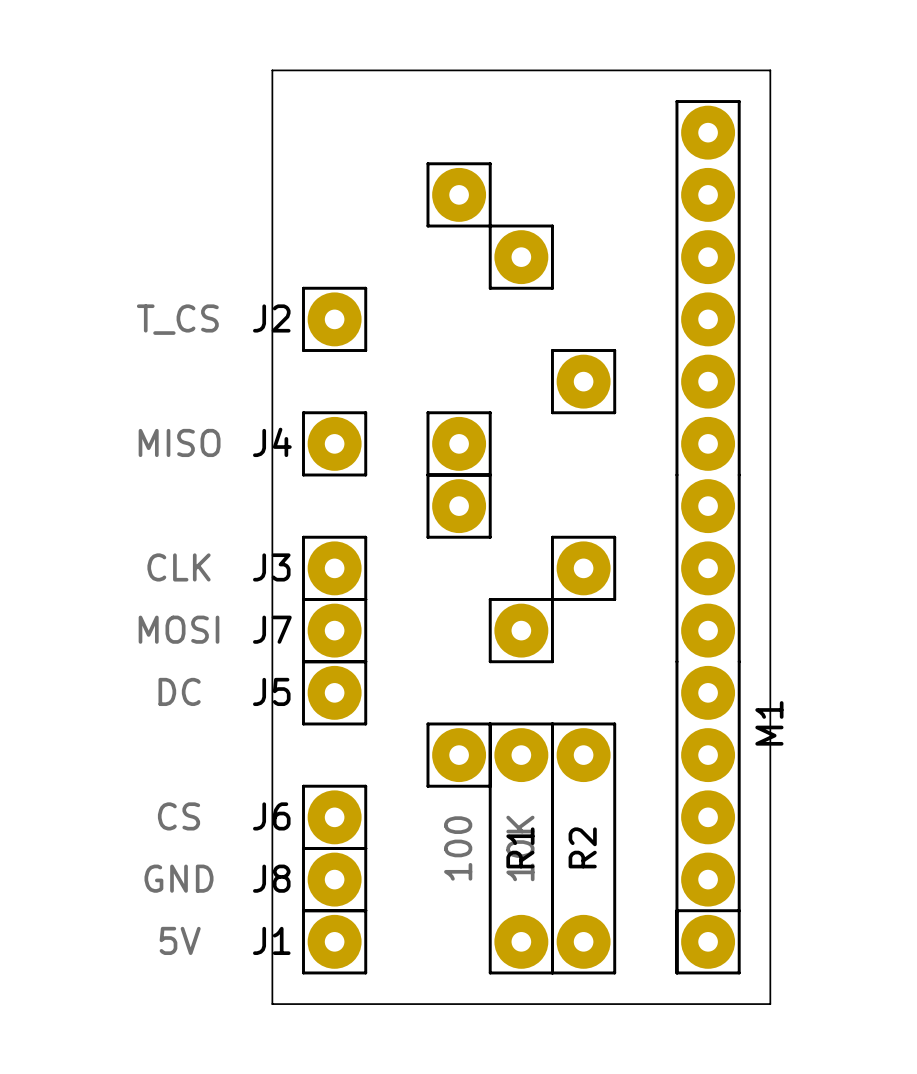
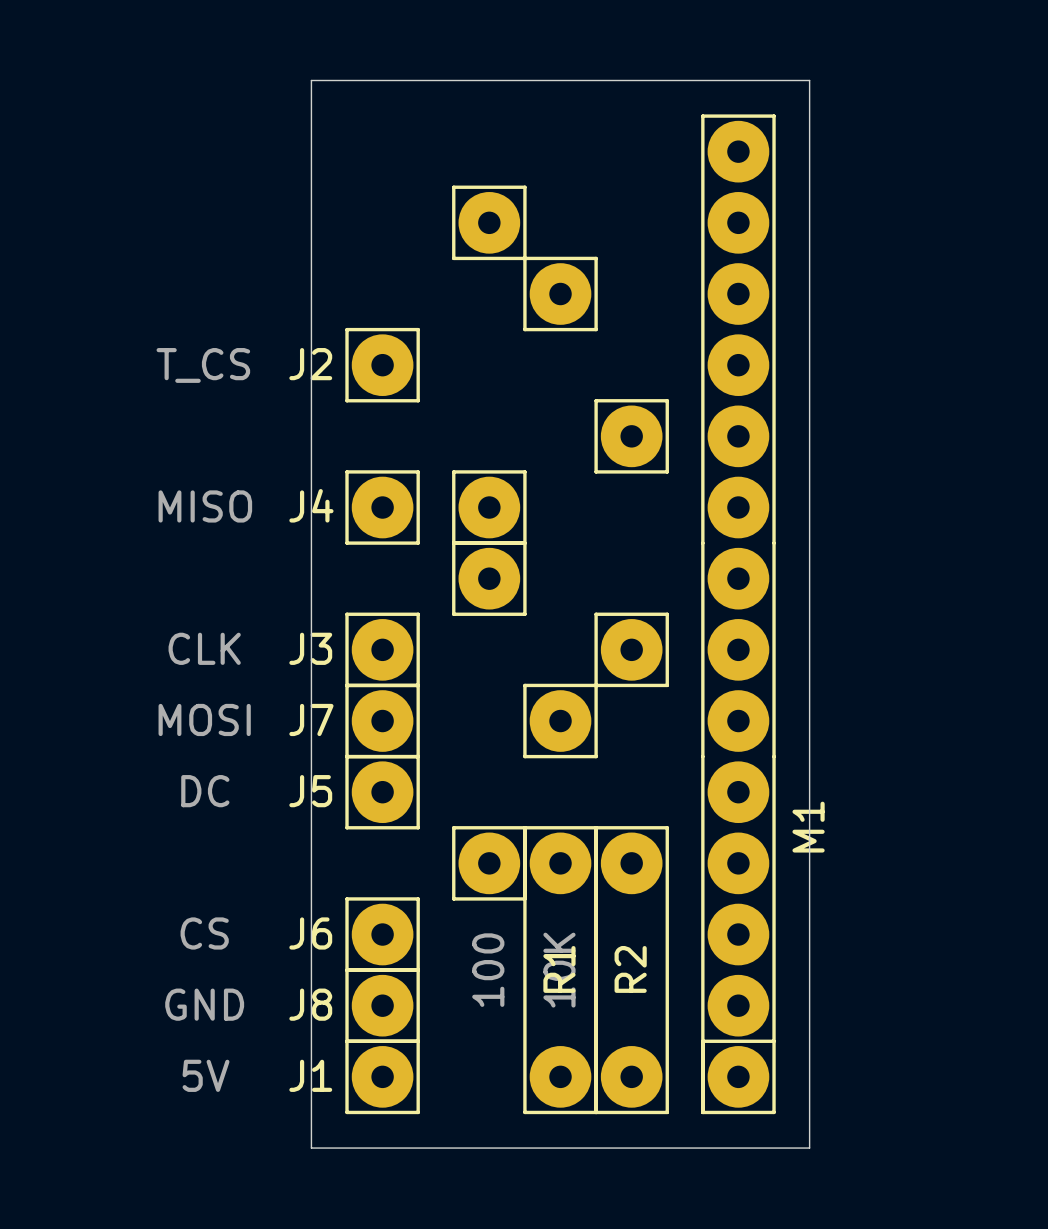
board edge: (708, 70) (770, 70) (770, 1004) (708, 1004) -> (809, 80) (809, 1148)
part position: (459, 194) -> (489, 222)
part position: (521, 257) -> (560, 294)
part position: (583, 381) -> (631, 436)
part position: (459, 443) -> (489, 507)
part position: (459, 506) -> (489, 578)
M1 position: (708, 537) -> (738, 614)
part position: (583, 568) -> (631, 649)
part position: (521, 630) -> (560, 721)
part position: (459, 755) -> (489, 863)
R1 position: (521, 848) -> (560, 970)
R2 position: (583, 848) -> (631, 970)

